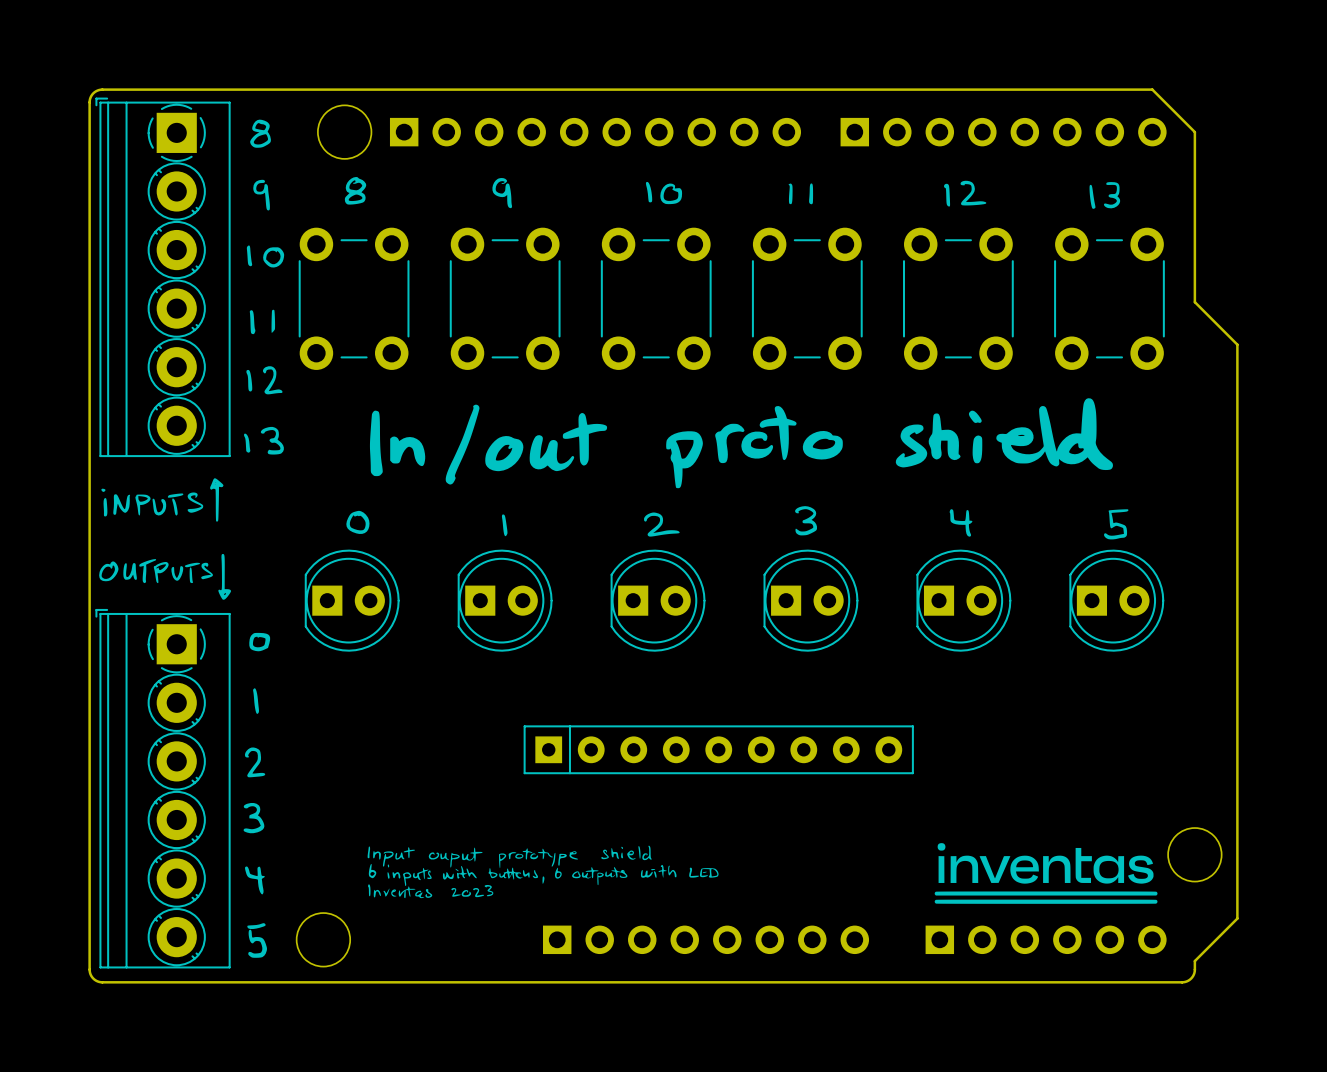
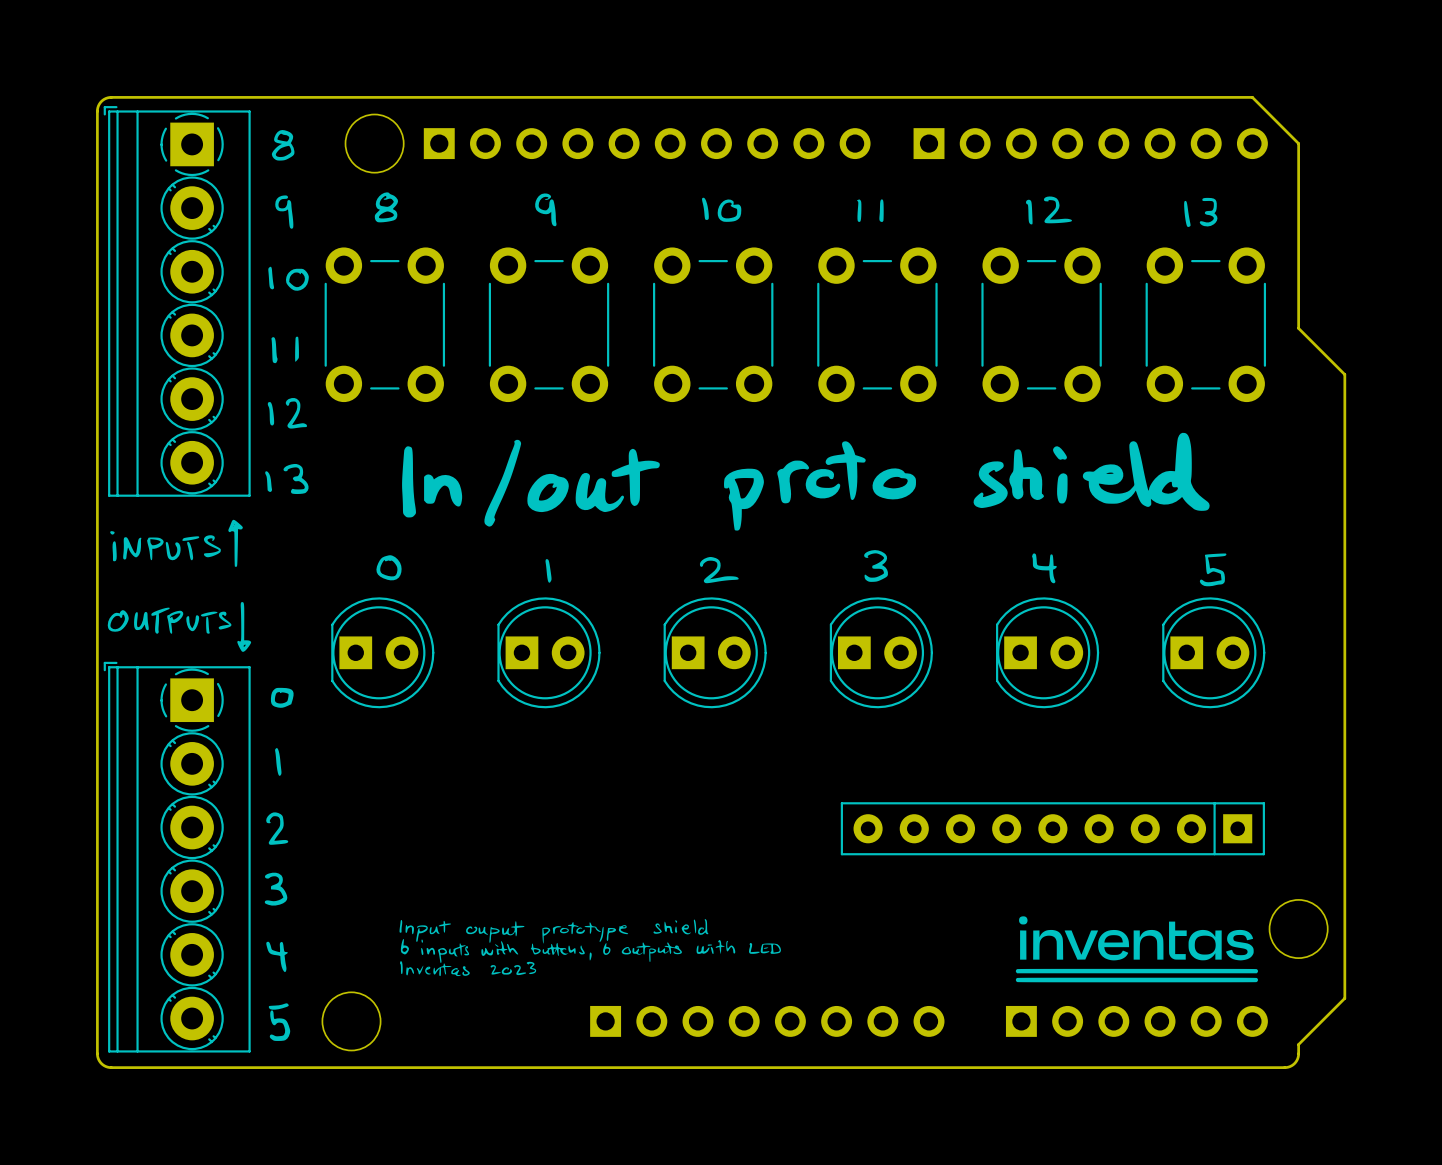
part rotation: 0° (718, 749) -> 180° (1052, 828)
part position: (718, 749) -> (1052, 828)

